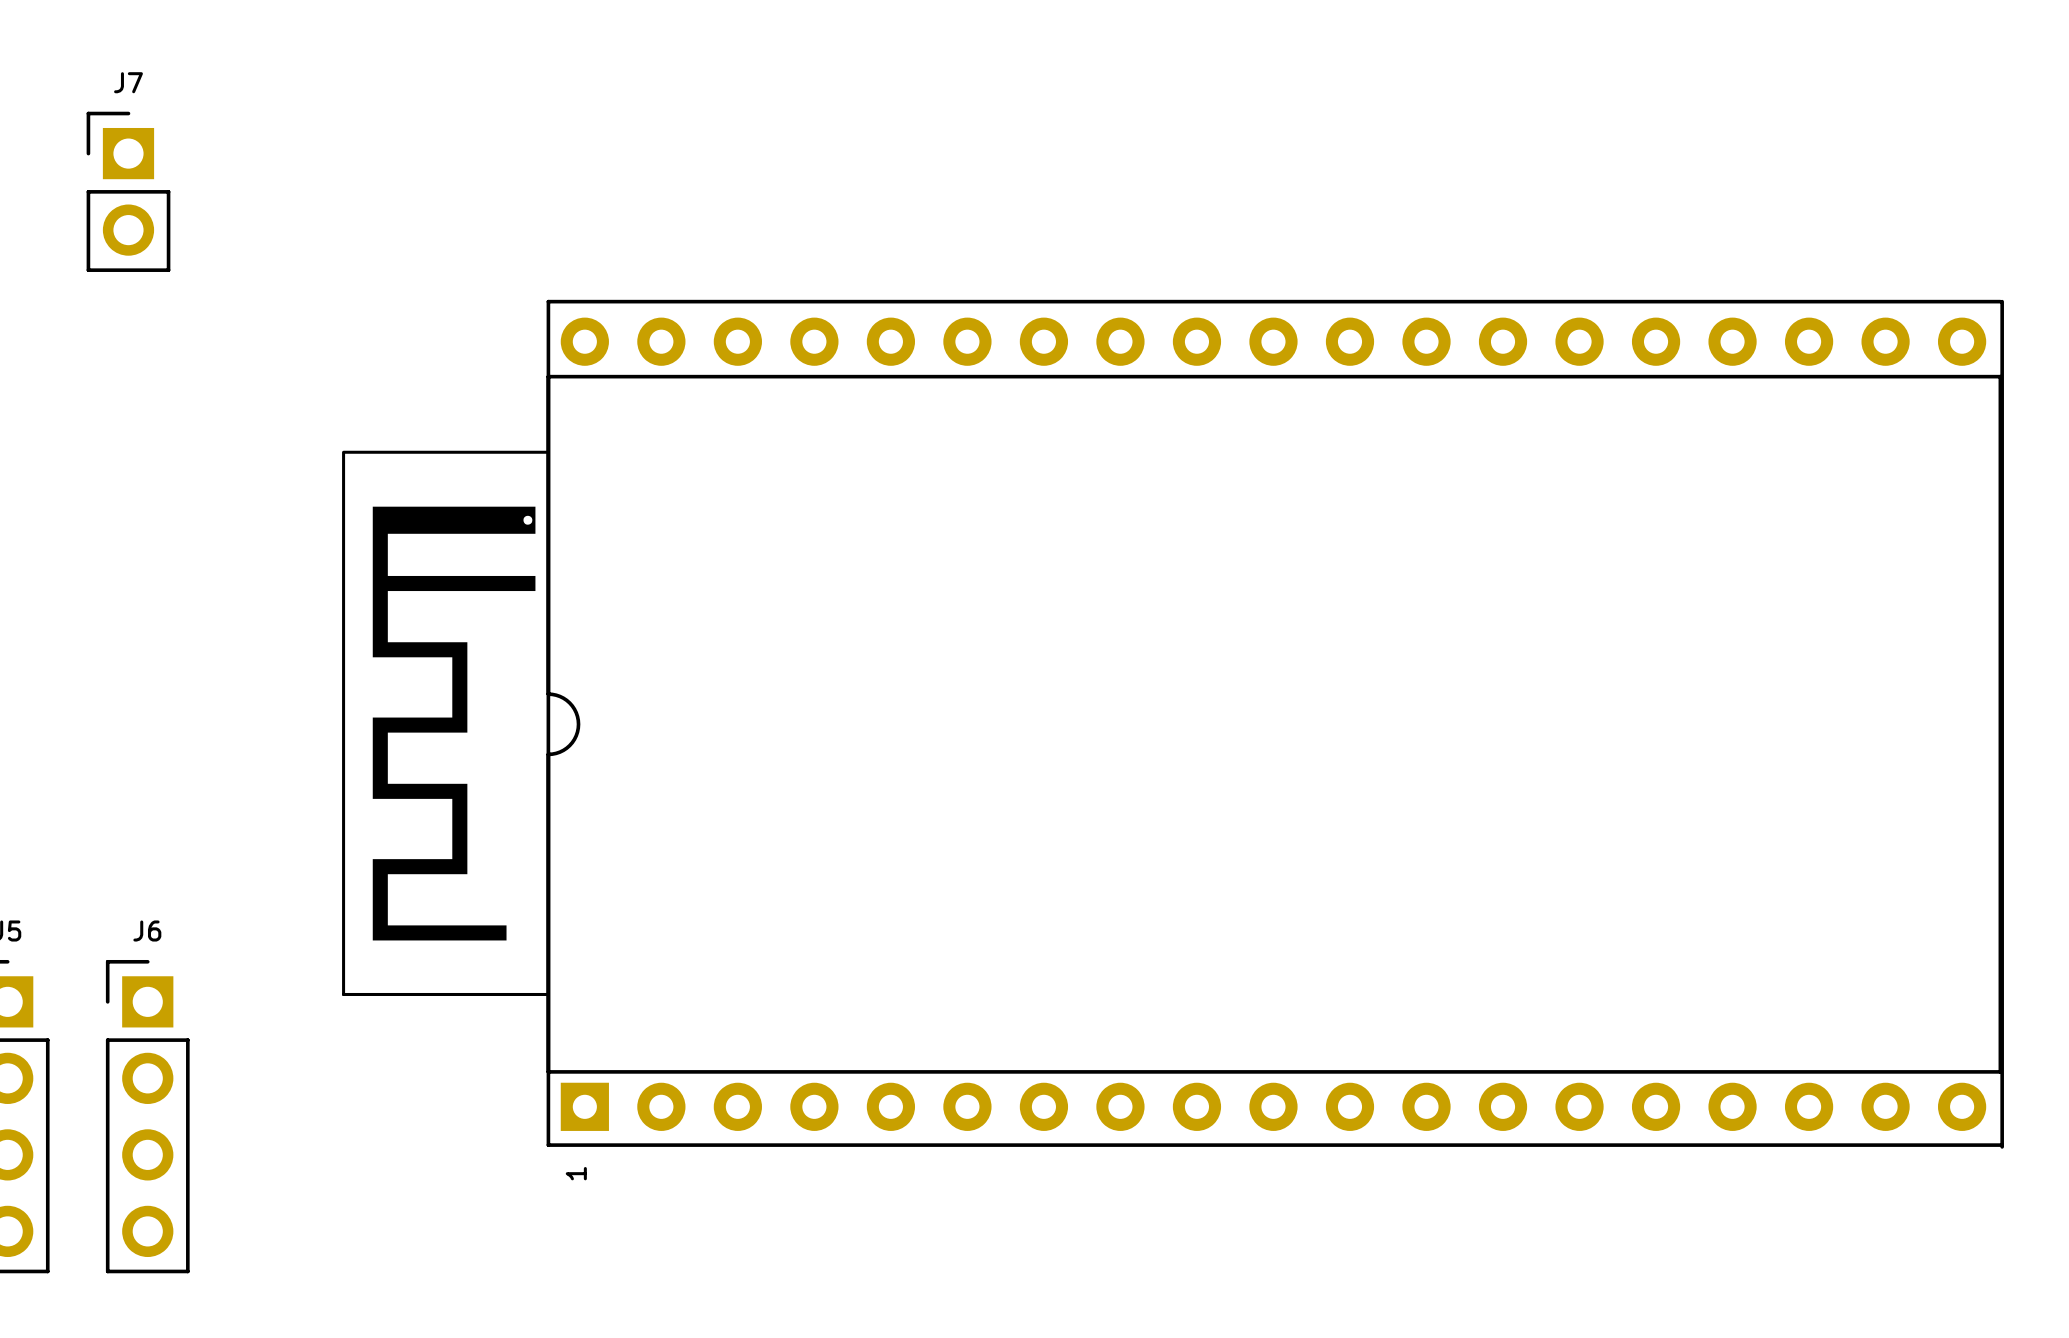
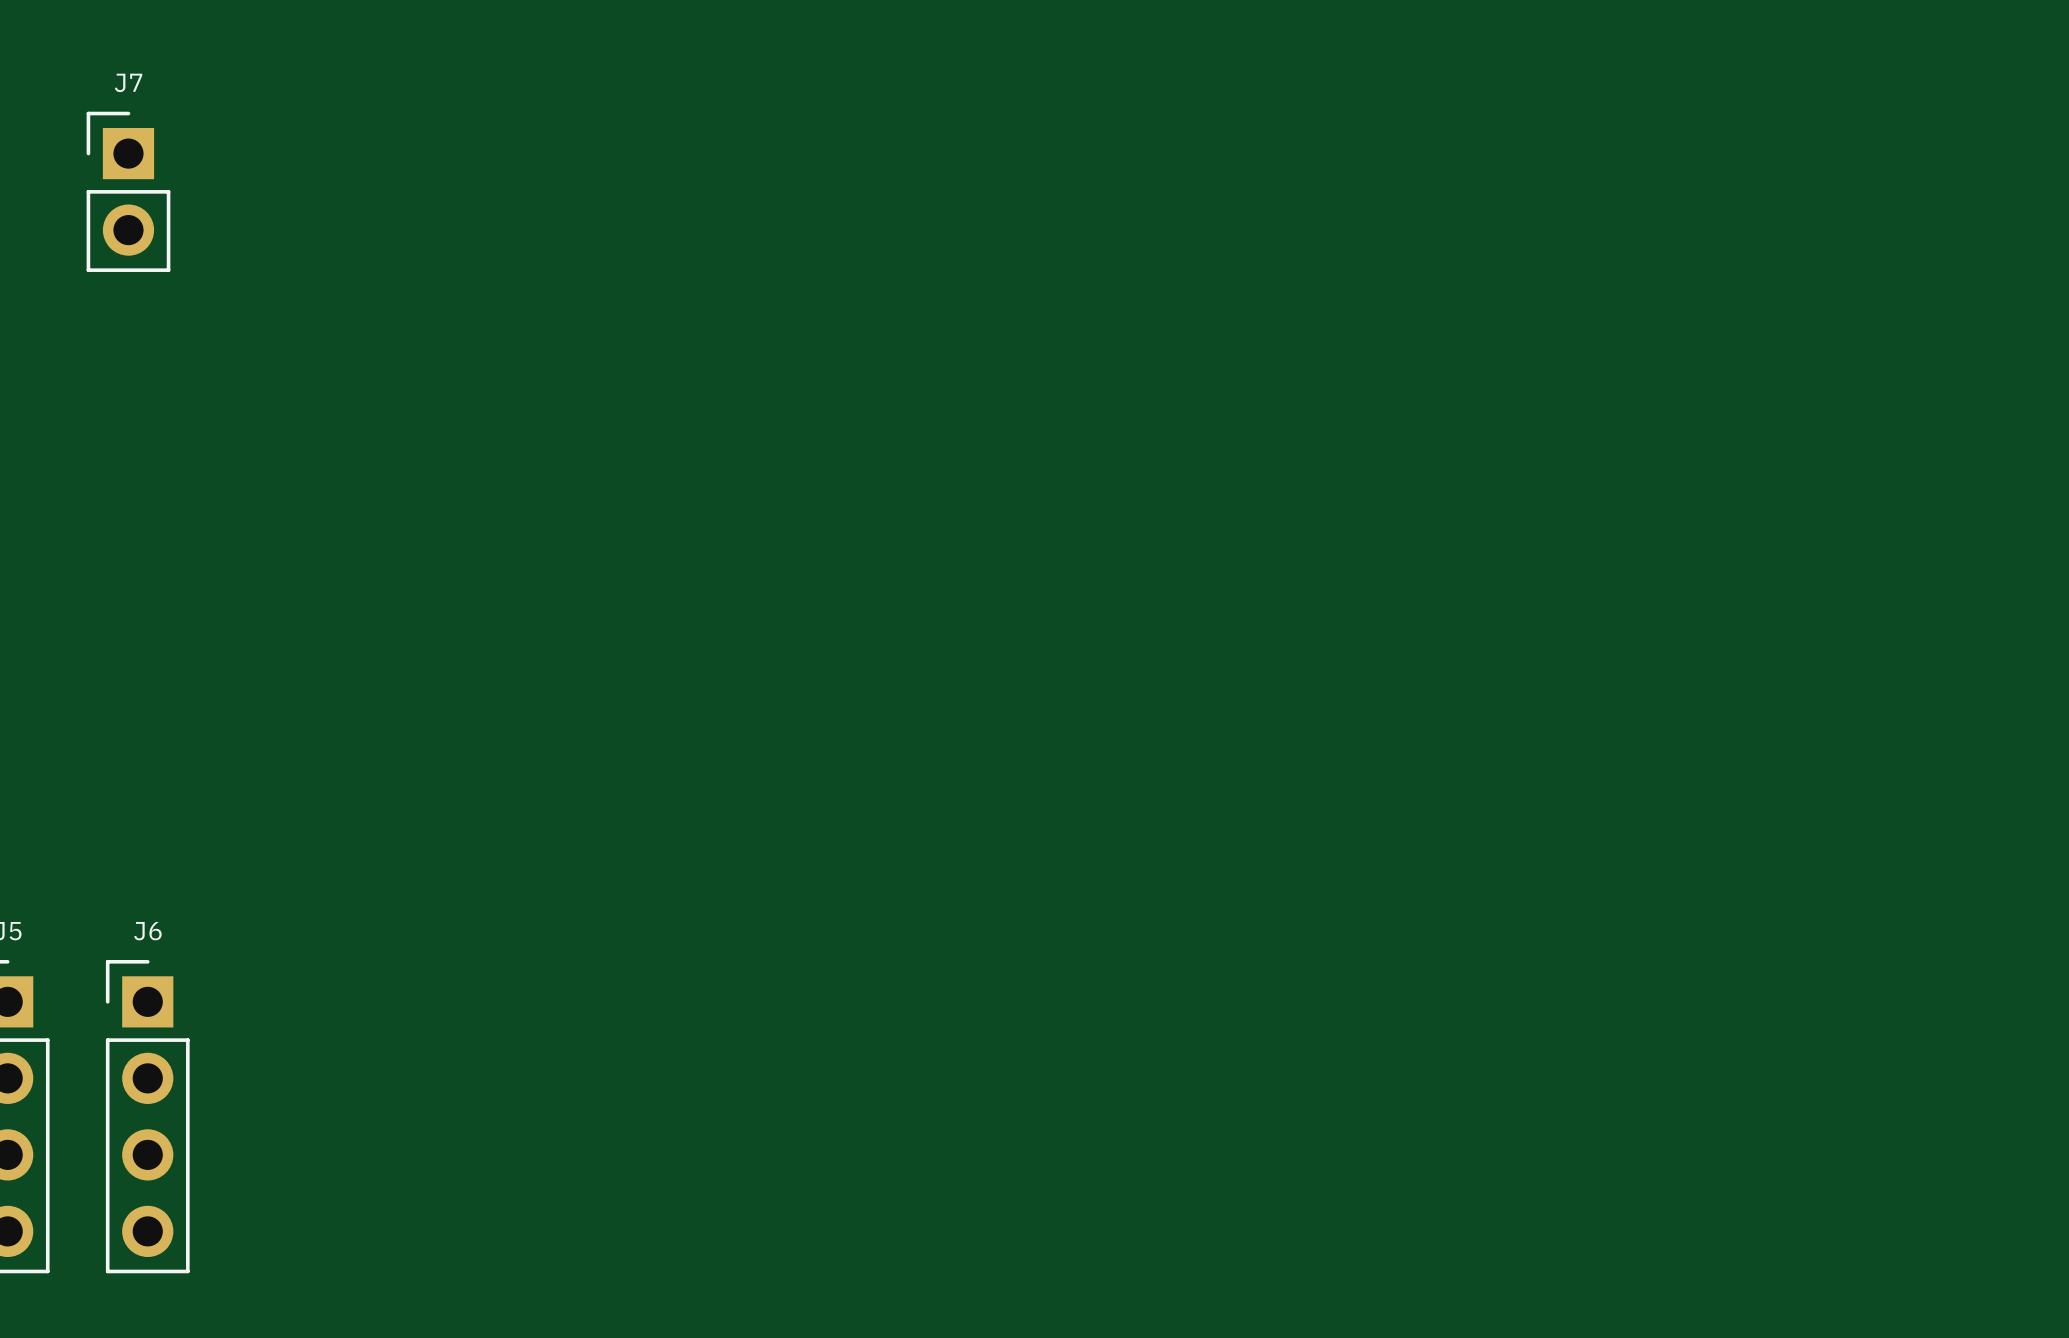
part: (1173, 724) -> none

